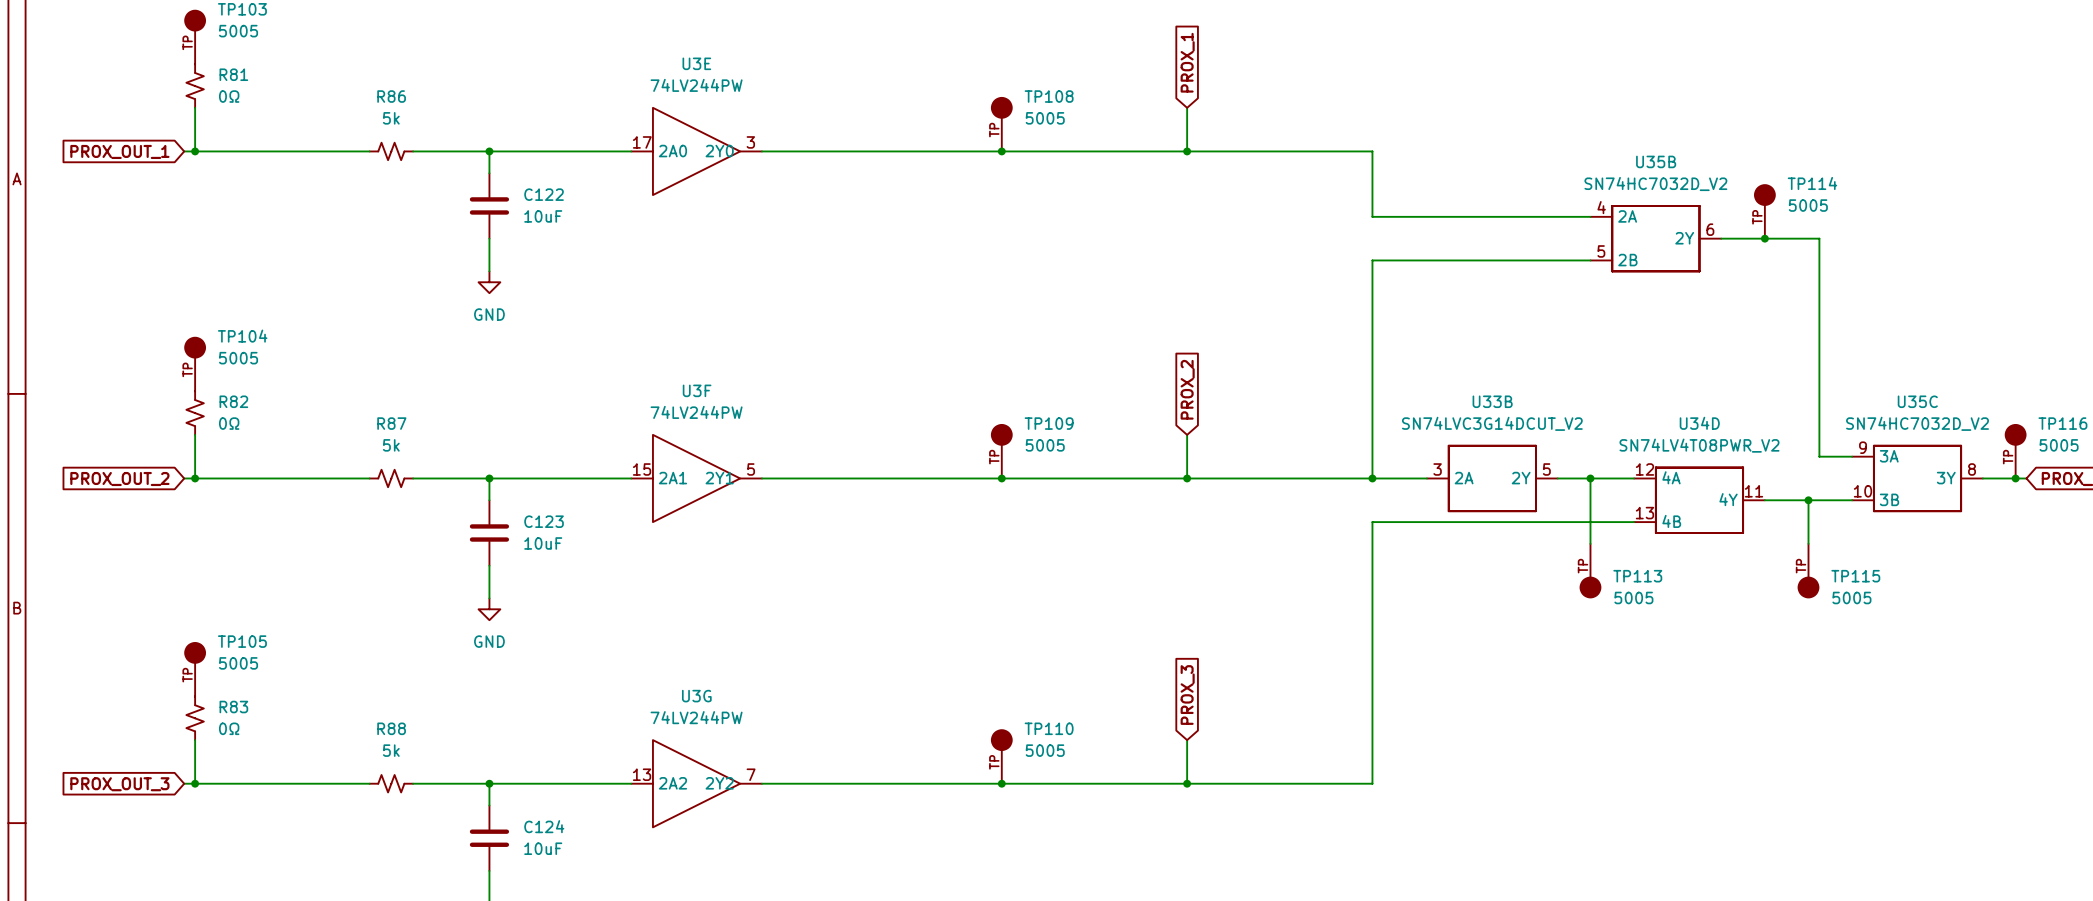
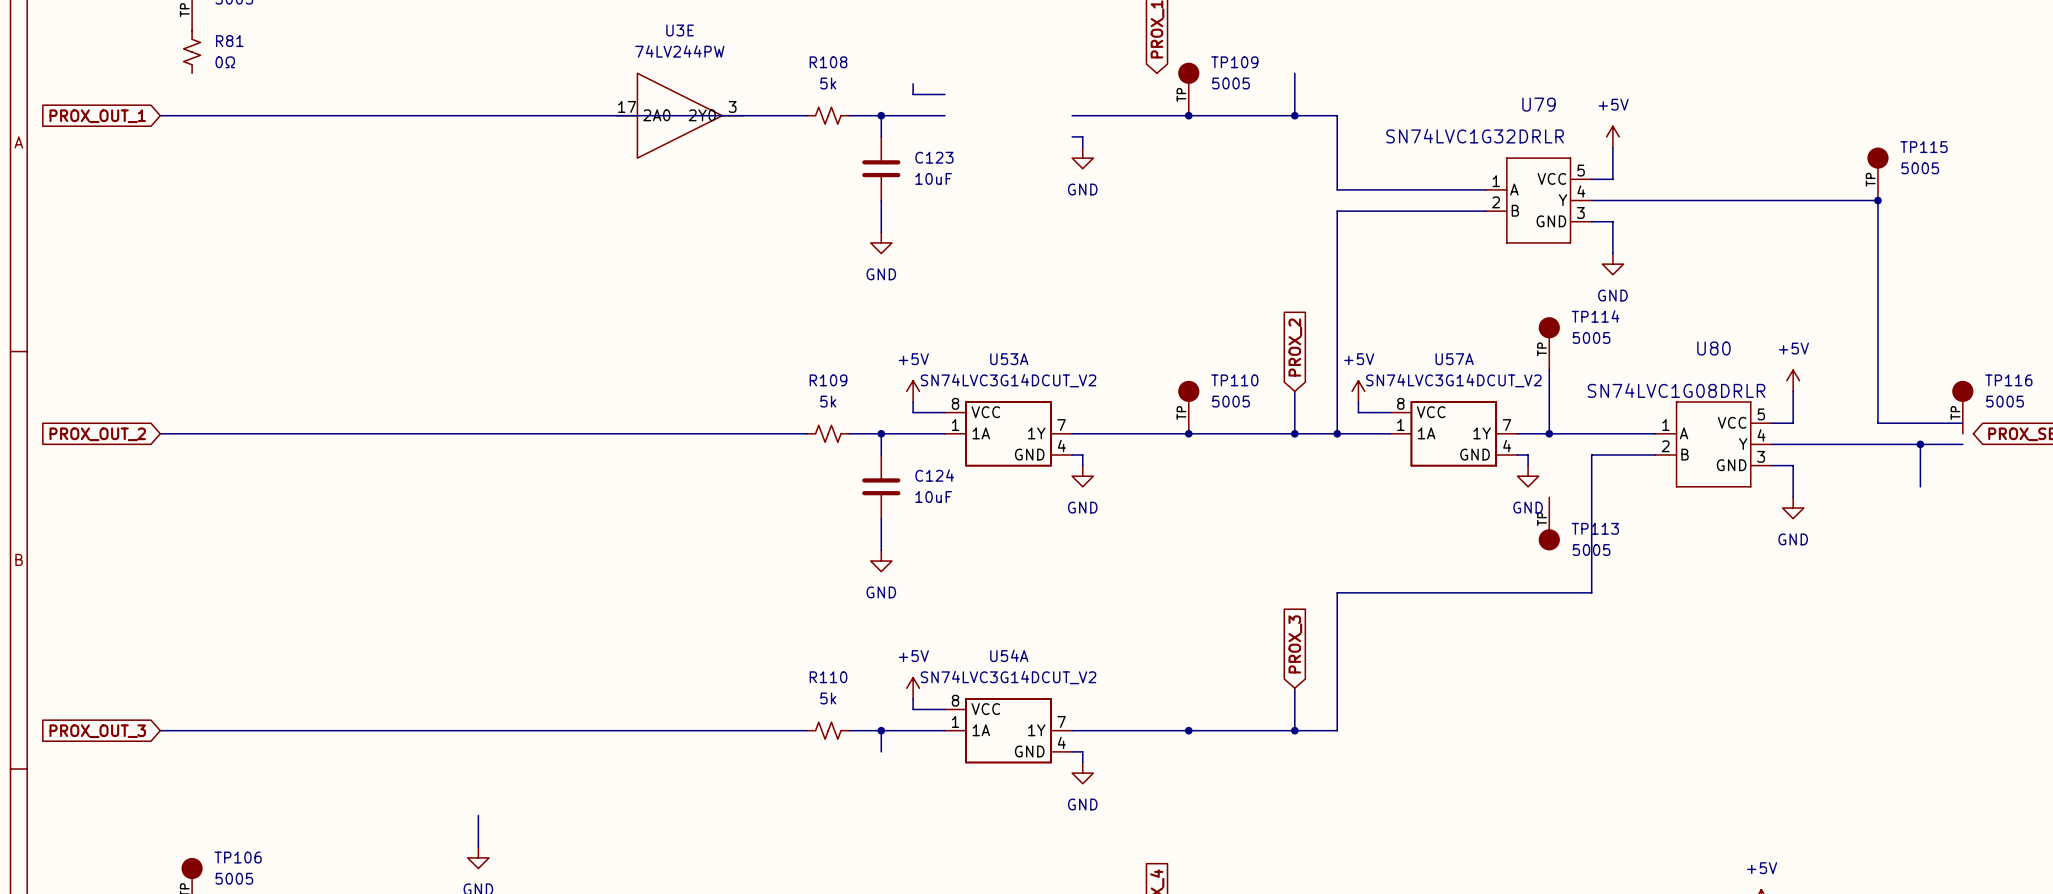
wire: (195, 107) (195, 151) -> none
wire: (1187, 107) (1187, 151) -> (1294, 73) (1294, 115)
wire: none -> (913, 83) (913, 94) (944, 94)
TP108: 5005 (1001, 124) -> none
global label position: PROX_OUT_1 (119, 151) -> PROX_OUT_1 (97, 116)
wire: none -> (160, 115) (181, 115)
junction: (195, 151) -> none
R86: 5k (391, 151) -> none
wire: (489, 151) (489, 173) -> none
junction: (489, 151) -> none
wire: none -> (616, 115) (743, 115)
R108: none -> 5k (828, 115)
wire: none -> (881, 115) (881, 136)
junction: none -> (881, 115)
wire: (969, 151) (1099, 151) -> none
junction: (1001, 151) -> none
junction position: (1187, 151) -> (1188, 115)
junction: none -> (1294, 115)
wire: none -> (1072, 136) (1082, 136) (1082, 147)
power symbol: none -> +5V (1612, 136)
wire: none -> (1612, 147) (1612, 179) (1591, 179)
power symbol: none -> GND (1082, 158)
C122: 10uF (489, 205) -> none
TP114 position: (1764, 211) -> (1549, 343)
wire: (1372, 216) (1590, 216) -> (1337, 179) (1337, 189) (1485, 189)
wire: (489, 238) (489, 271) -> none
wire: none -> (881, 200) (881, 232)
U79: none -> SN74LVC1G32DRLR (1538, 200)
wire: none -> (1591, 200) (1676, 200)
U35B: SN74HC7032D_V2 (1655, 238) -> none
junction: (1764, 238) -> none
wire: (1819, 238) (1819, 456) (1852, 456) -> (1771, 200) (1877, 200) (1877, 423) (1962, 423)
junction: none -> (1877, 200)
wire: (1372, 260) (1590, 260) -> (1337, 221) (1337, 211) (1485, 211)
wire: none -> (1591, 221) (1612, 221) (1612, 253)
power symbol: GND (489, 282) -> none
power symbol: none -> GND (881, 242)
power symbol: none -> GND (1612, 264)
TP104: 5005 (195, 364) -> none
global label position: PROX_2 (1187, 389) -> PROX_2 (1295, 347)
R82: 0Ω (195, 413) -> none
power symbol: none -> +5V (1793, 380)
wire: (195, 434) (195, 478) -> none
power symbol: none -> +5V (913, 391)
wire: (1187, 434) (1187, 478) -> (1294, 391) (1294, 433)
power symbol: none -> +5V (1358, 391)
wire: none -> (1793, 391) (1793, 423) (1771, 423)
wire: none -> (913, 401) (913, 412) (944, 412)
wire: none -> (1358, 401) (1358, 412) (1390, 412)
TP109 position: (1001, 451) -> (1188, 89)
wire: none -> (160, 433) (181, 433)
junction: (195, 478) -> none
R87: 5k (391, 478) -> none
wire: (489, 478) (489, 500) -> none
junction: (489, 478) -> none
wire: none -> (616, 433) (743, 433)
U3F: 74LV244PW (696, 478) -> none
R109: none -> 5k (828, 433)
wire: none -> (881, 433) (881, 455)
junction: none -> (881, 433)
wire: (969, 478) (1099, 478) -> none
junction: (1001, 478) -> none
U53A: none -> SN74LVC3G14DCUT_V2 (1008, 433)
junction position: (1187, 478) -> (1188, 433)
junction: none -> (1294, 433)
U33B: SN74LVC3G14DCUT_V2 (1492, 478) -> none
U57A: none -> SN74LVC3G14DCUT_V2 (1453, 433)
wire: (1590, 478) (1590, 543) -> (1549, 433) (1549, 370)
wire: none -> (1591, 433) (1655, 433)
U35C: SN74HC7032D_V2 (1917, 478) -> none
wire: (1982, 478) (2026, 478) -> none
junction position: (2015, 478) -> (1920, 444)
global label position: PROX_OUT_2 (119, 479) -> PROX_OUT_2 (97, 434)
U80: none -> SN74LVC1G08DRLR (1713, 444)
wire: none -> (1771, 444) (1962, 444)
wire: none -> (1072, 455) (1082, 455) (1082, 465)
wire: none -> (1517, 455) (1528, 455) (1528, 465)
U34D: SN74LV4T08PWR_V2 (1699, 500) -> none
wire: (1764, 500) (1852, 500) -> none
wire: (1808, 500) (1808, 543) -> (1920, 444) (1920, 486)
junction: (1808, 500) -> none
wire: none -> (1771, 465) (1793, 465) (1793, 497)
power symbol: none -> GND (1082, 476)
power symbol: none -> GND (1528, 476)
wire: (1634, 522) (1372, 522) (1372, 642) -> (1655, 455) (1591, 455) (1591, 592) (1337, 592)
C123 position: (489, 532) -> (881, 168)
power symbol: none -> GND (1793, 508)
wire: (489, 565) (489, 598) -> none
wire: none -> (881, 518) (881, 550)
TP115 position: (1808, 571) -> (1877, 174)
TP115 name position: TP115 (1855, 576) -> TP115 (1924, 147)
TP115 rotation: 0° (1808, 587) -> 180° (1877, 158)
TP115 value position: 5005 (1851, 597) -> 5005 (1920, 168)
power symbol: GND (489, 609) -> none
power symbol: none -> GND (881, 561)
TP105: 5005 (195, 669) -> none
global label position: PROX_3 (1187, 695) -> PROX_3 (1295, 644)
R83: 0Ω (195, 718) -> none
wire: (195, 740) (195, 783) -> none
power symbol: none -> +5V (913, 688)
wire: (1187, 740) (1187, 783) -> (1294, 688) (1294, 730)
wire: none -> (913, 698) (913, 709) (944, 709)
TP110 position: (1001, 756) -> (1188, 407)
wire: none -> (160, 730) (181, 730)
junction: (195, 783) -> none
R88: 5k (391, 783) -> none
wire: (489, 783) (489, 805) -> none
junction: (489, 783) -> none
wire: none -> (616, 730) (743, 730)
U3G: 74LV244PW (696, 783) -> none
R110: none -> 5k (828, 730)
wire: none -> (881, 730) (881, 751)
junction: none -> (881, 730)
wire: (969, 783) (1099, 783) -> none
junction: (1001, 783) -> none
U54A: none -> SN74LVC3G14DCUT_V2 (1008, 730)
junction position: (1187, 783) -> (1188, 730)
junction: none -> (1294, 730)
global label position: PROX_OUT_3 (119, 784) -> PROX_OUT_3 (97, 731)
wire: none -> (1072, 751) (1082, 751) (1082, 762)
power symbol: none -> GND (1082, 773)
C124 position: (489, 838) -> (881, 486)

